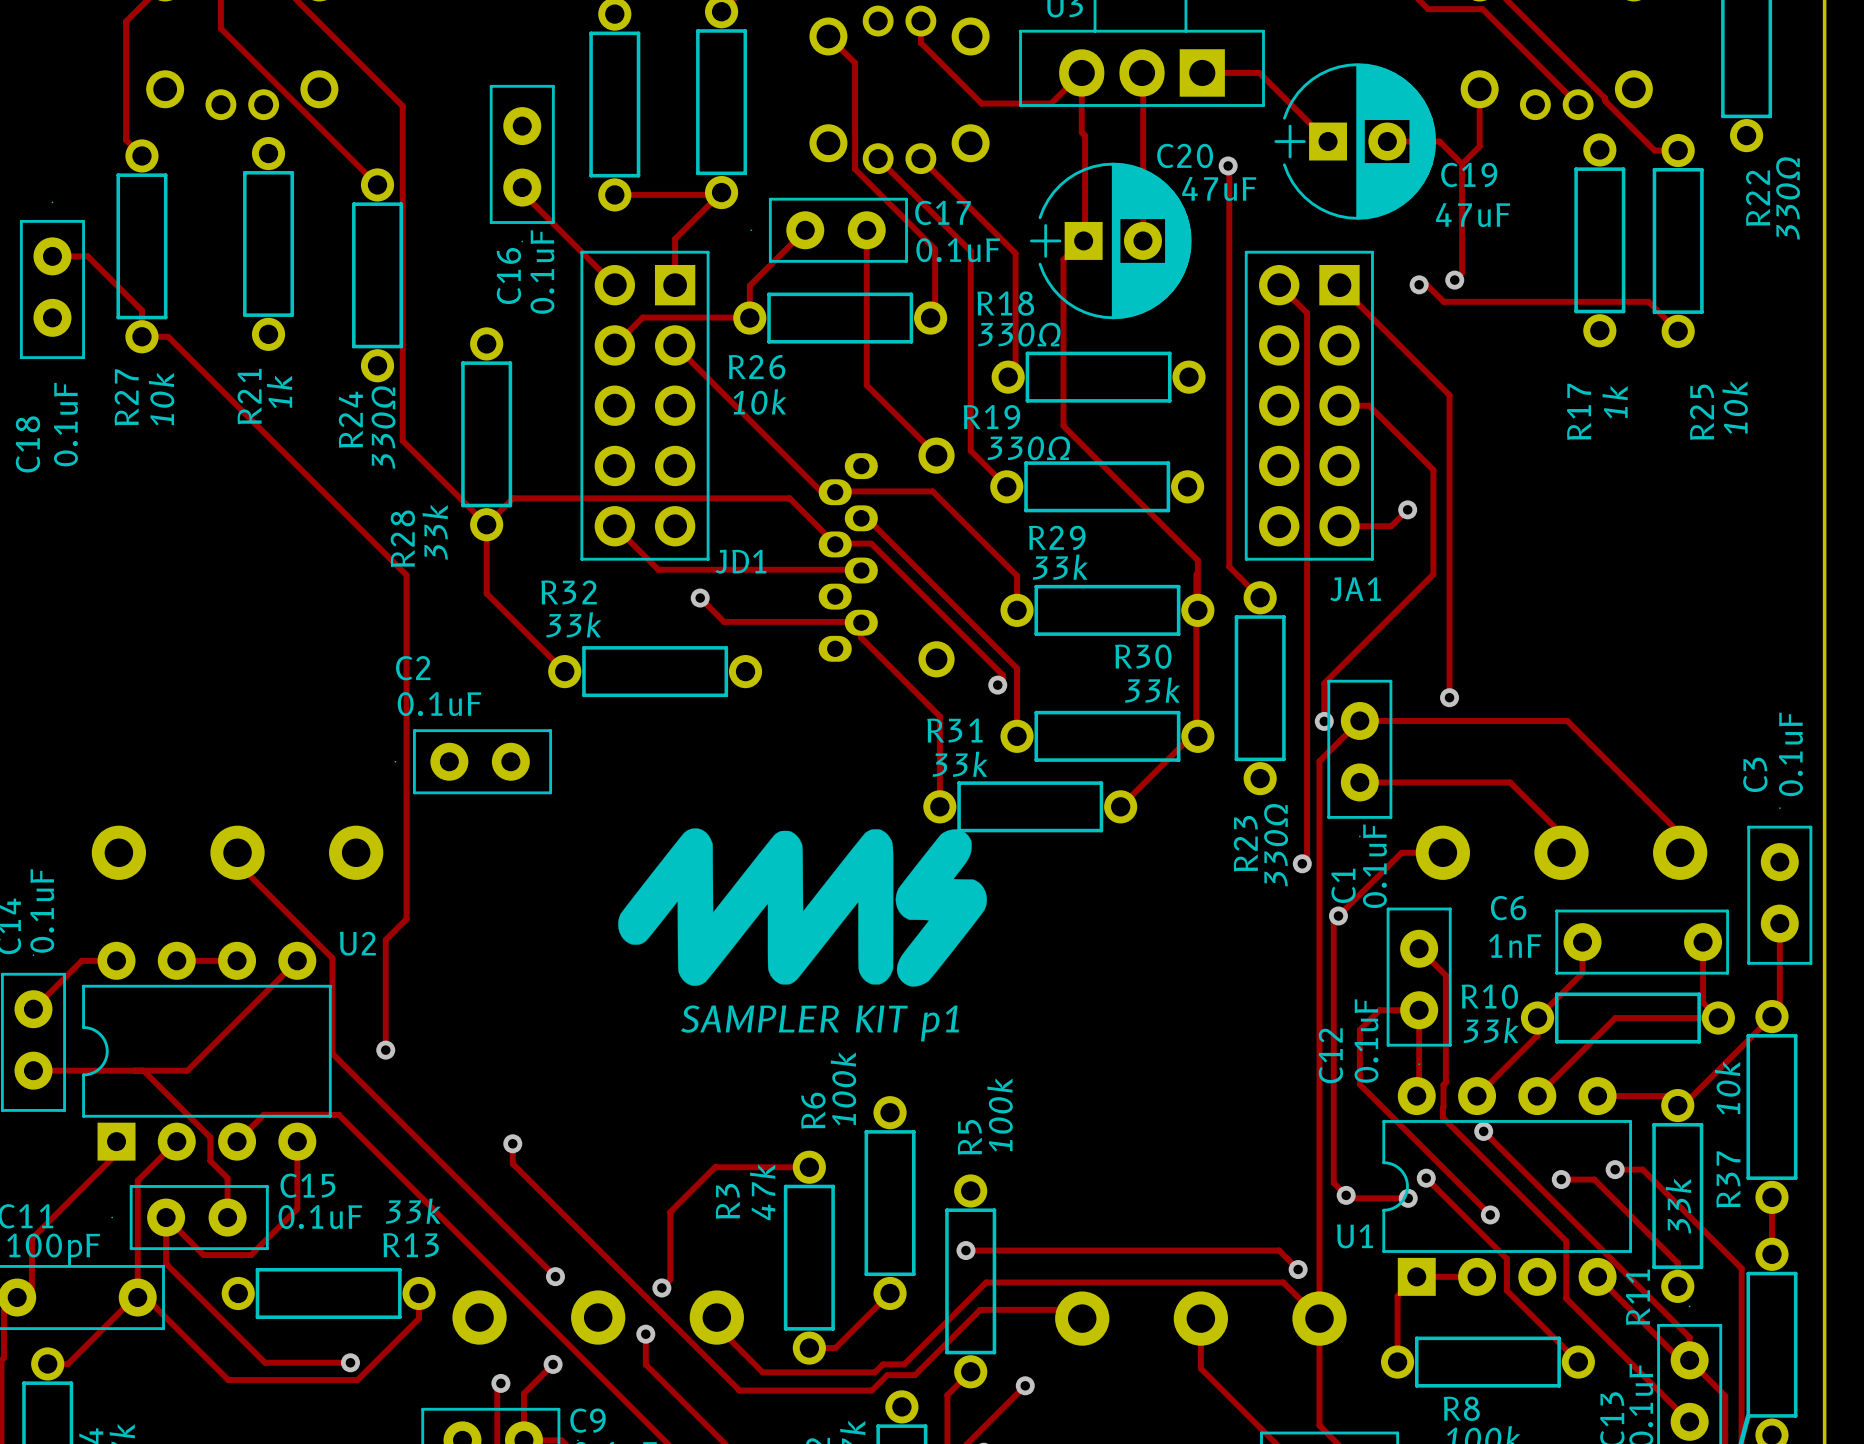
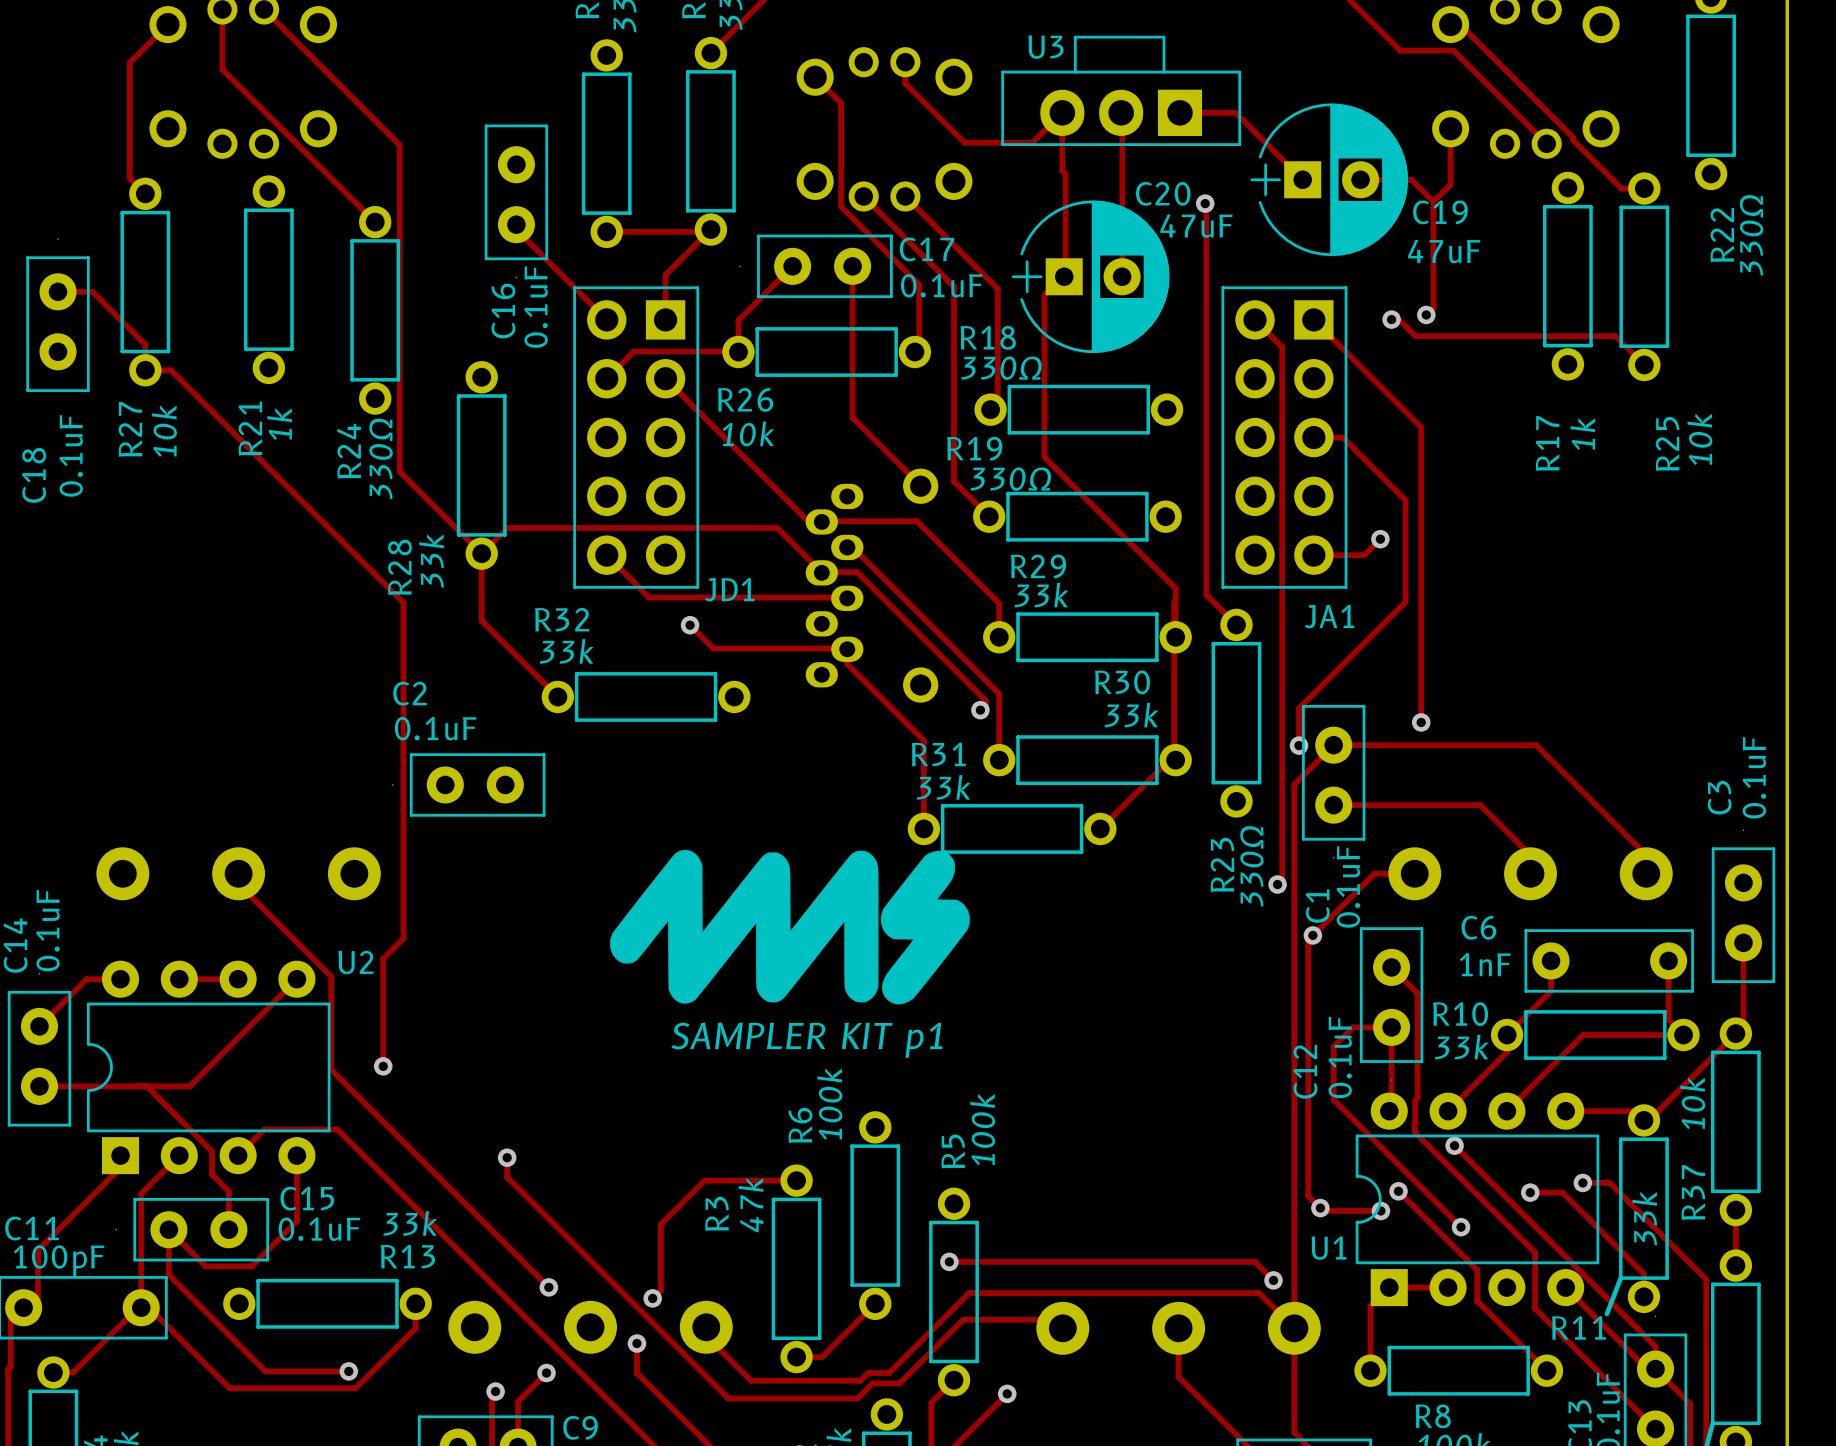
line: none -> (1620, 1278) (1606, 1313)
R11 name rotation: 0° (1637, 1297) -> 90° clockwise (1578, 1327)

